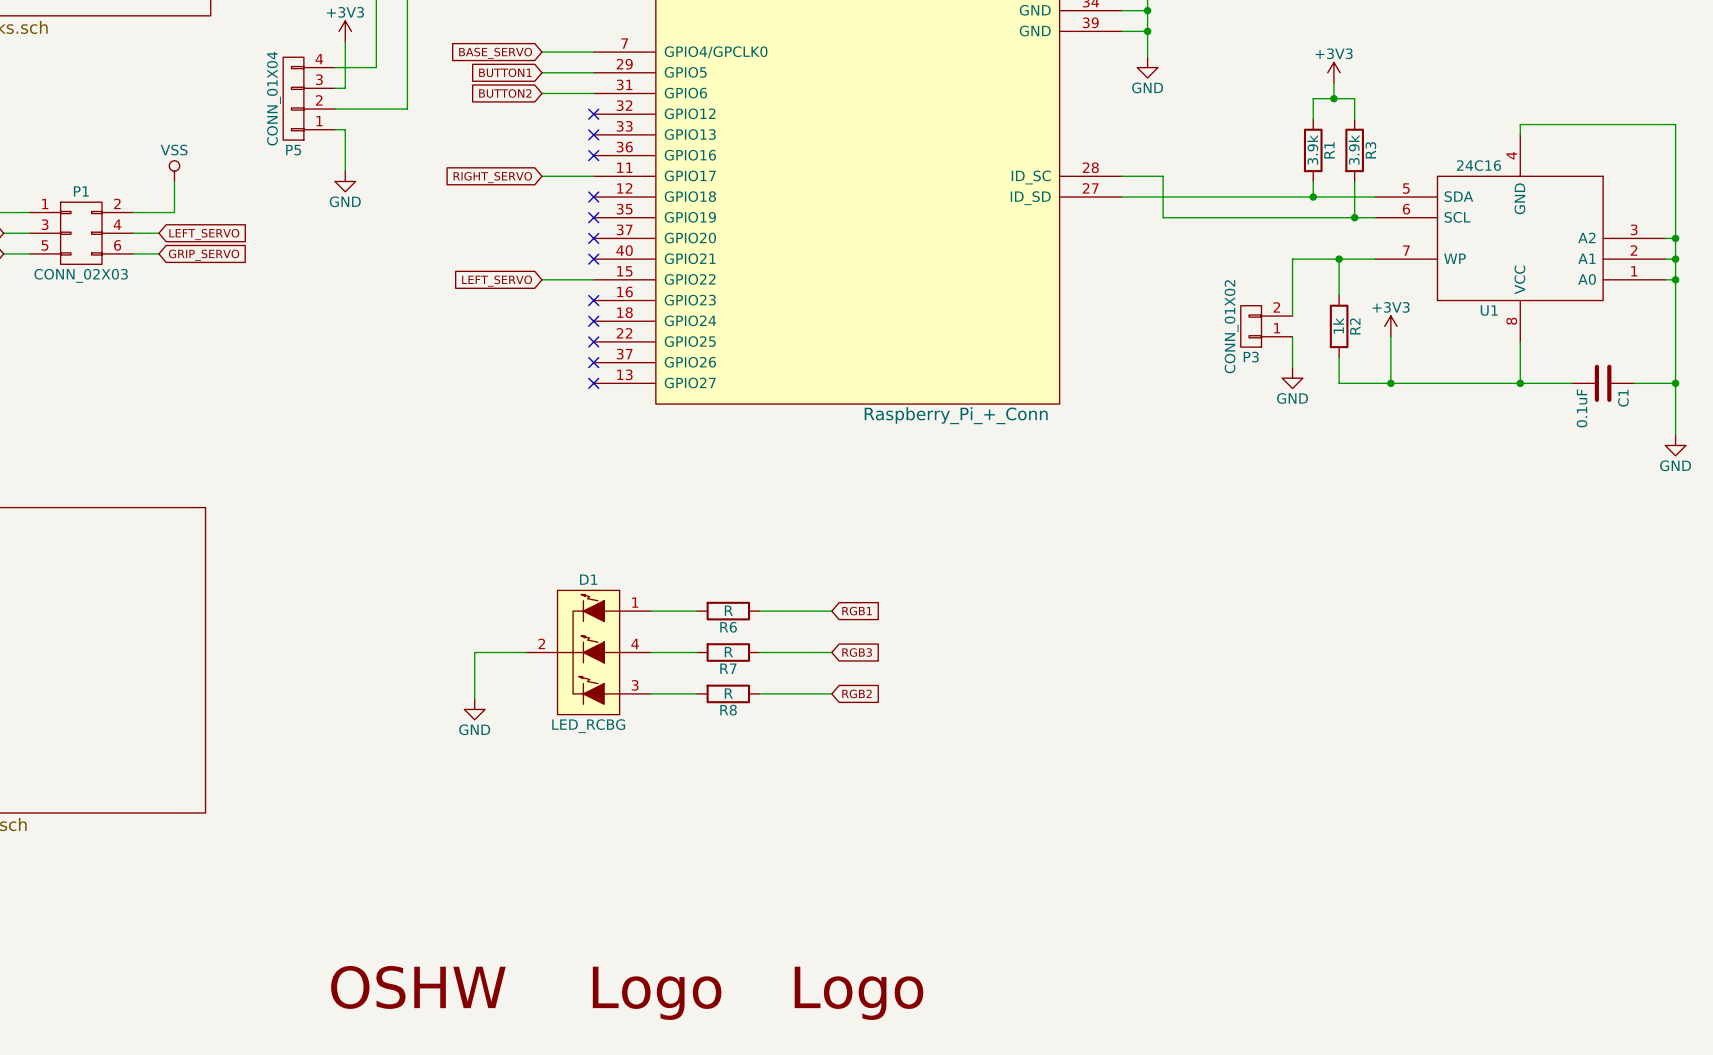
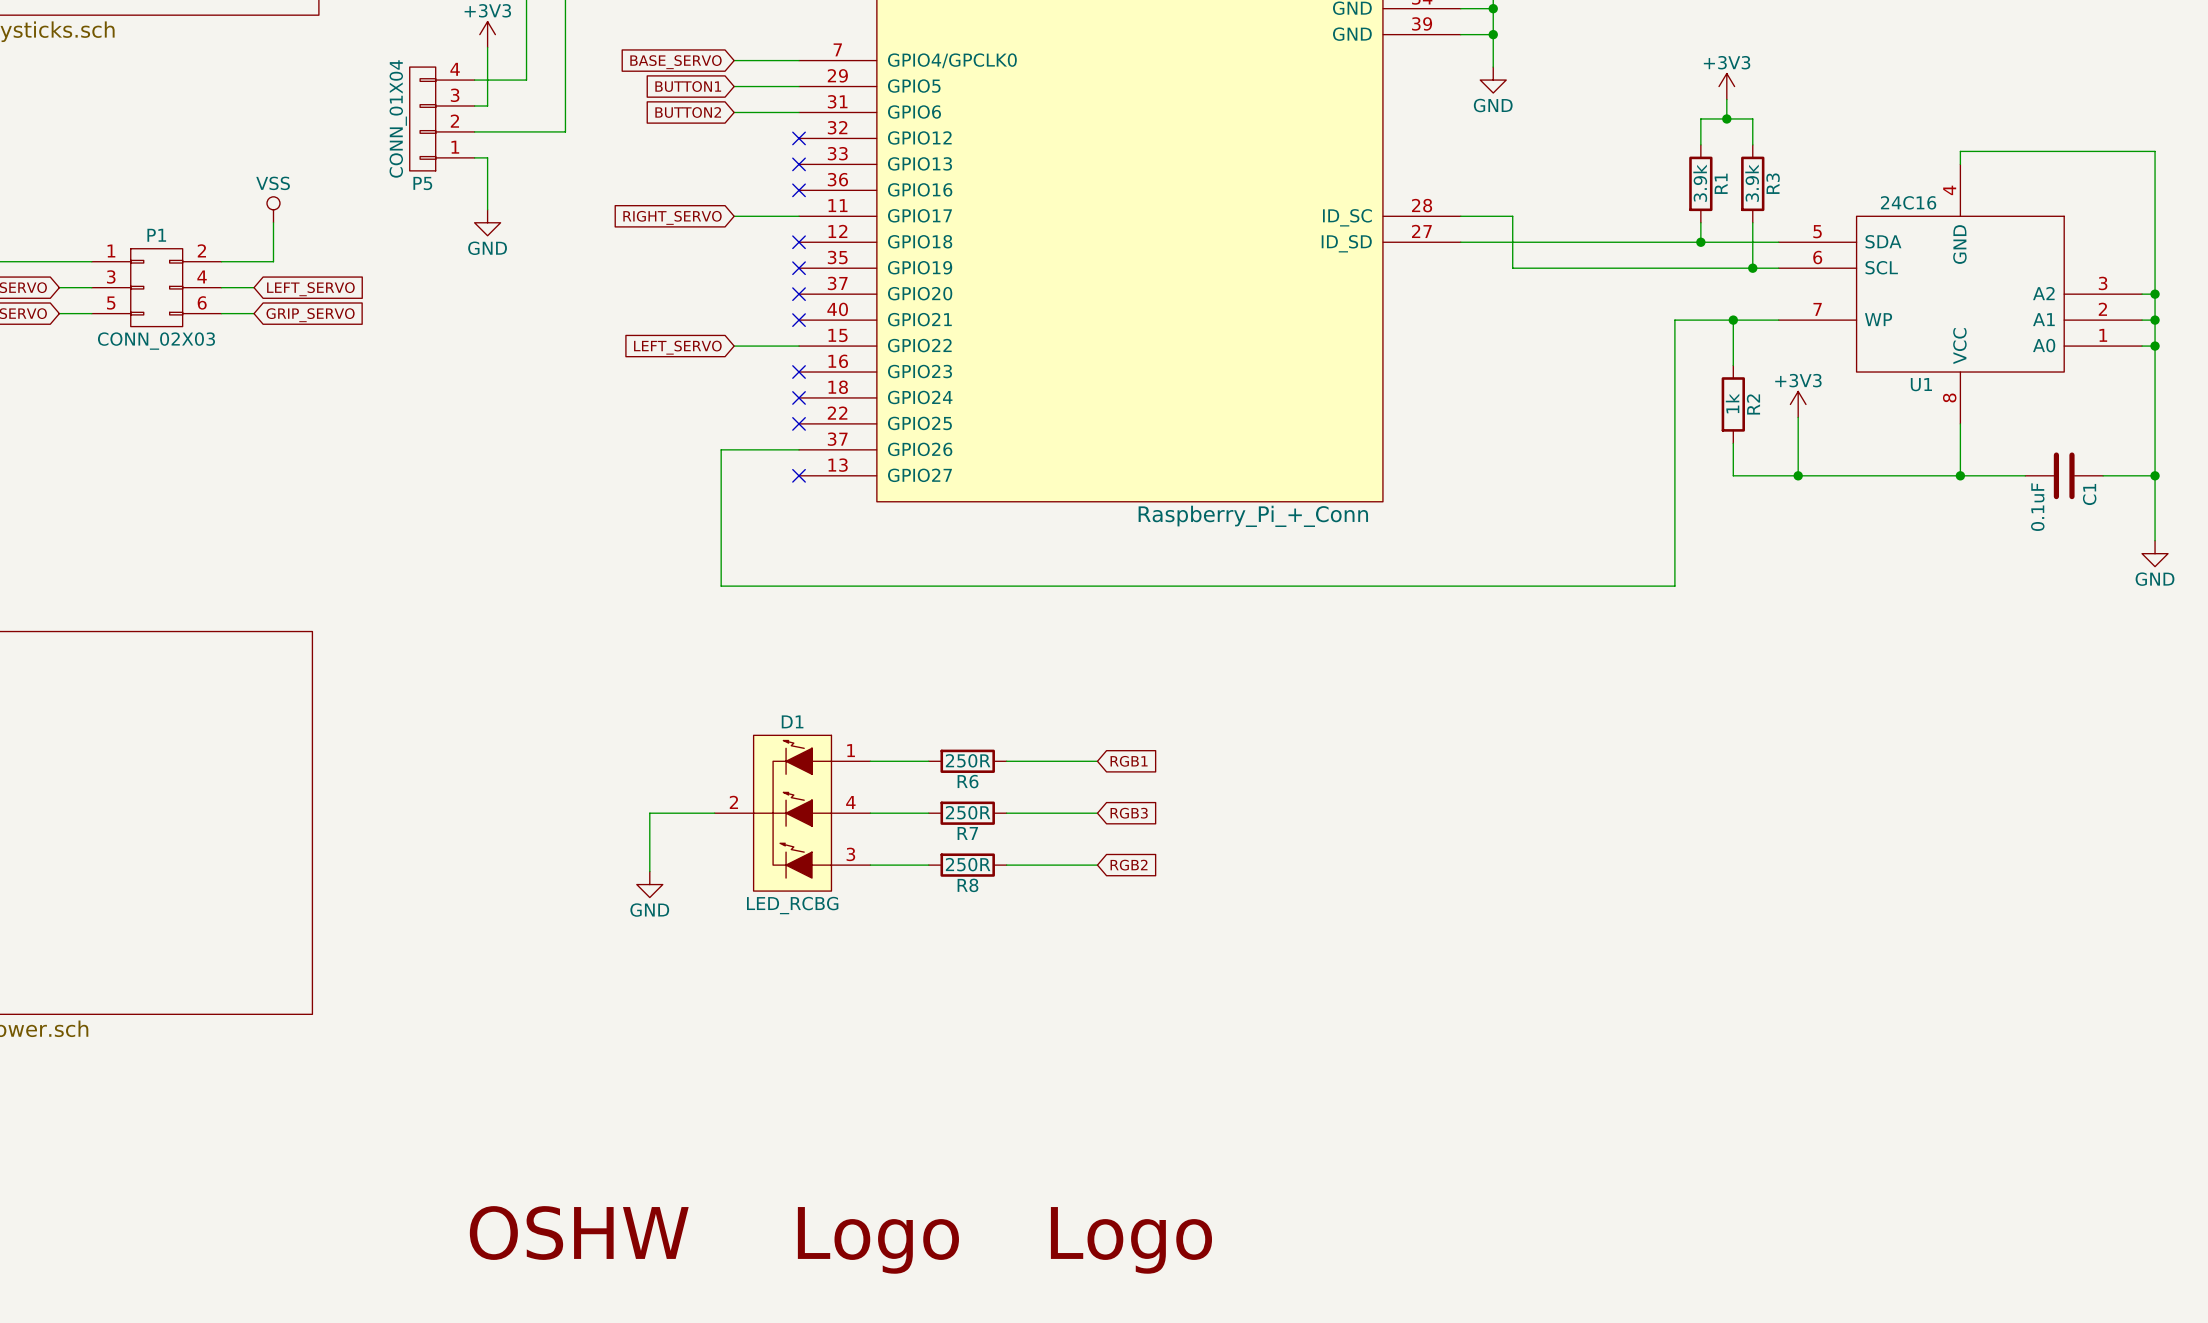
wire: none -> (1674, 391) (1674, 417)
P3: CONN_01X02 (1266, 326) -> none
wire: none -> (799, 449) (721, 449) (721, 586) (1674, 586) (1674, 456)
no-connect mark: (593, 362) -> none
power symbol: GND (1292, 378) -> none
R6 value: R (728, 610) -> 250R (968, 760)
R7 value: R (728, 652) -> 250R (968, 812)
R8 value: R (728, 693) -> 250R (968, 864)

